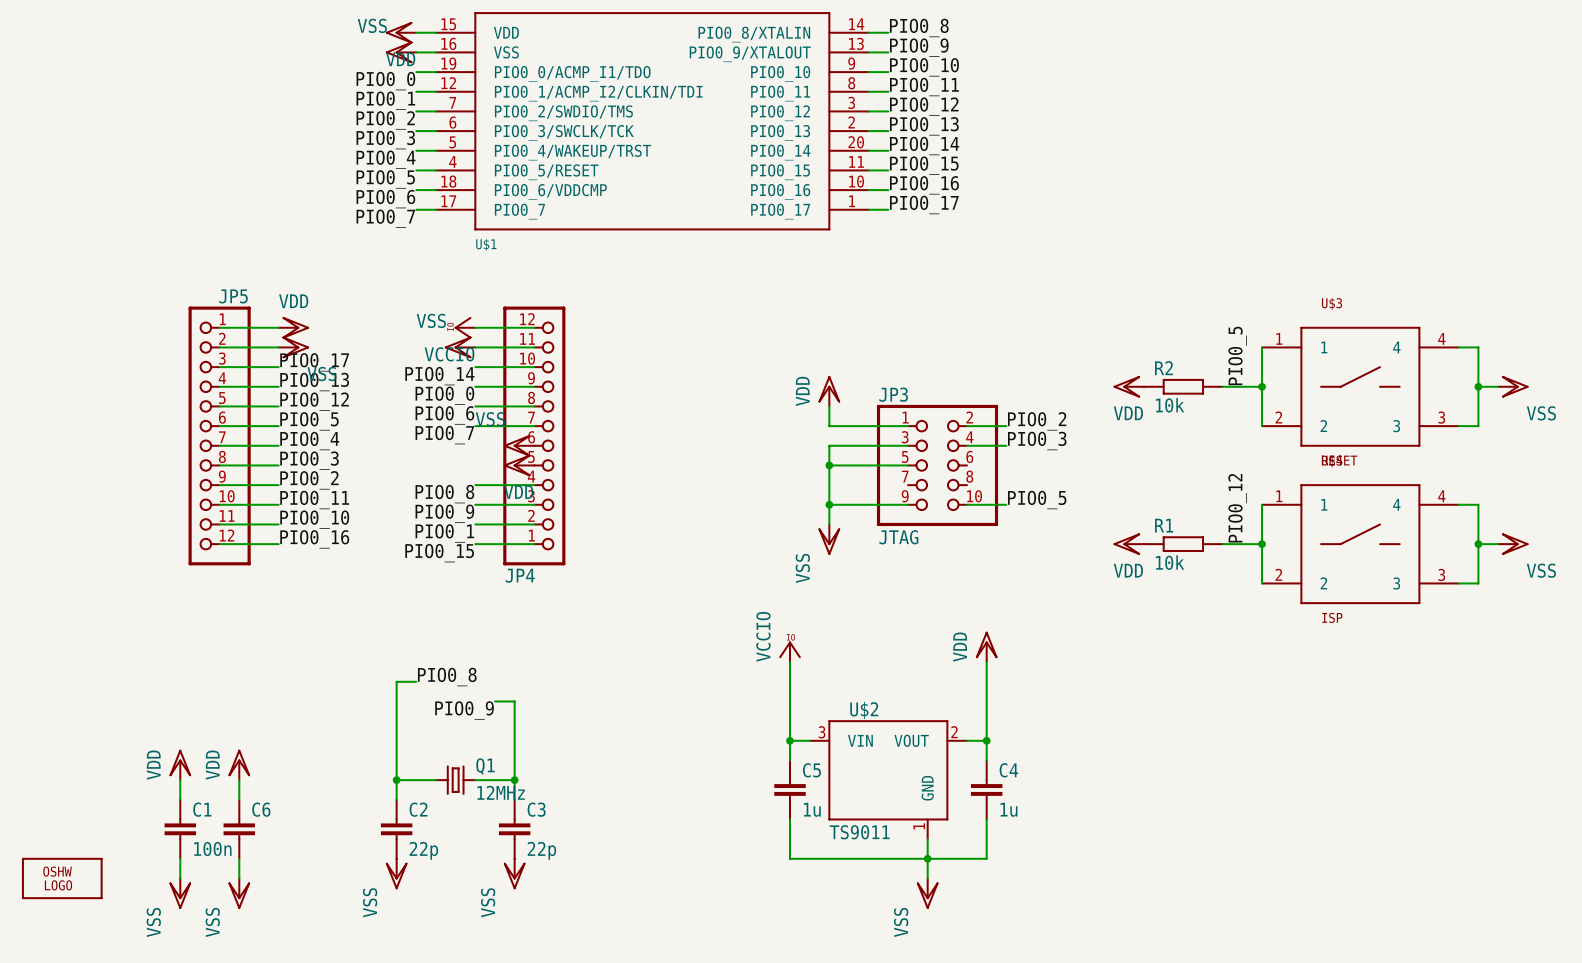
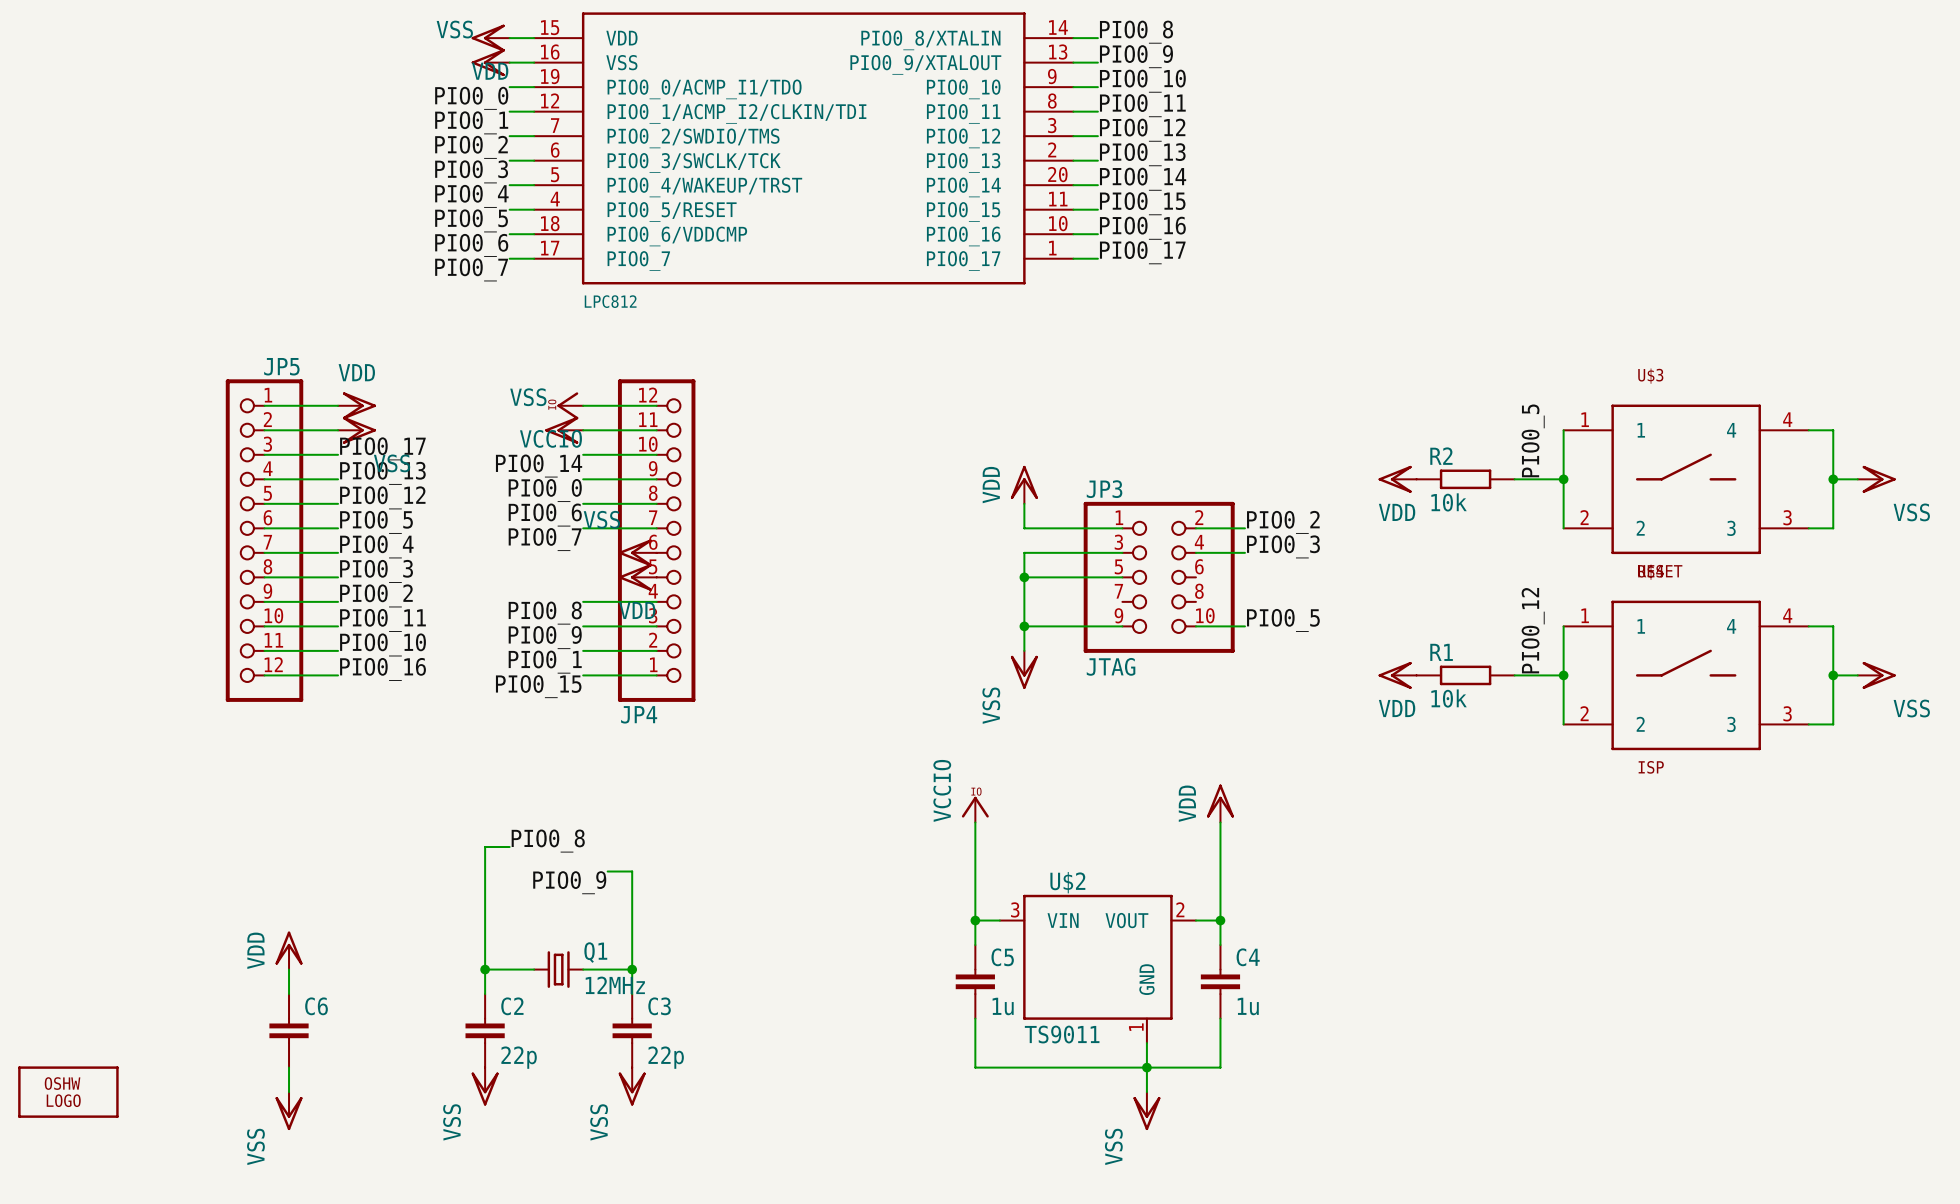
U$1 name: U$1 (486, 244) -> LPC812 (610, 301)
power symbol: VDD (180, 764) -> none
wire: (180, 780) (180, 799) -> none
C1: 100n (180, 829) -> none
wire: (180, 858) (180, 878) -> none
power symbol: VSS (180, 893) -> none

